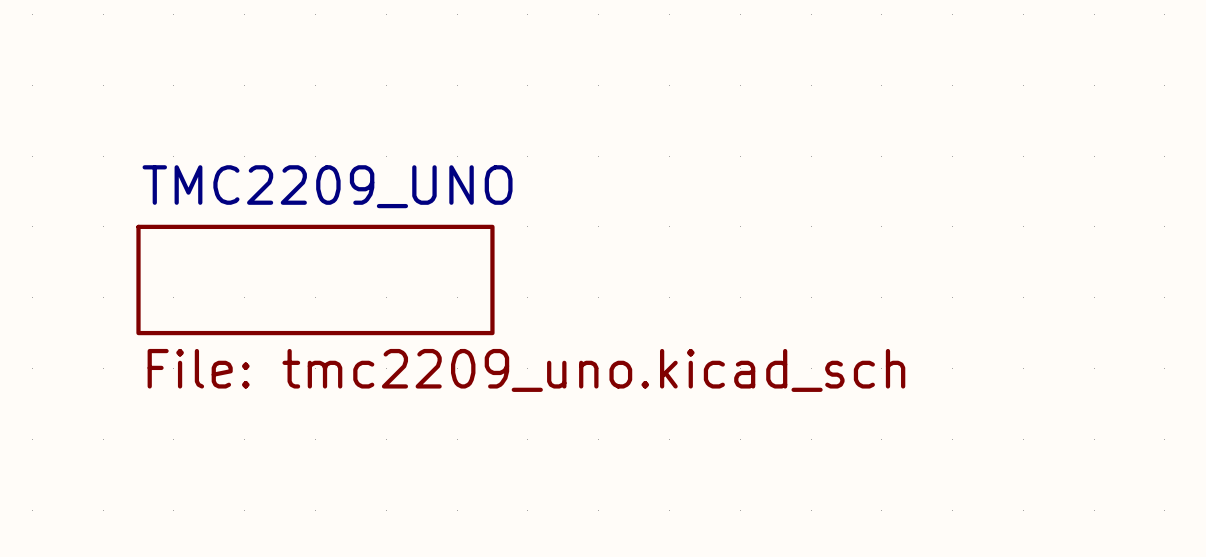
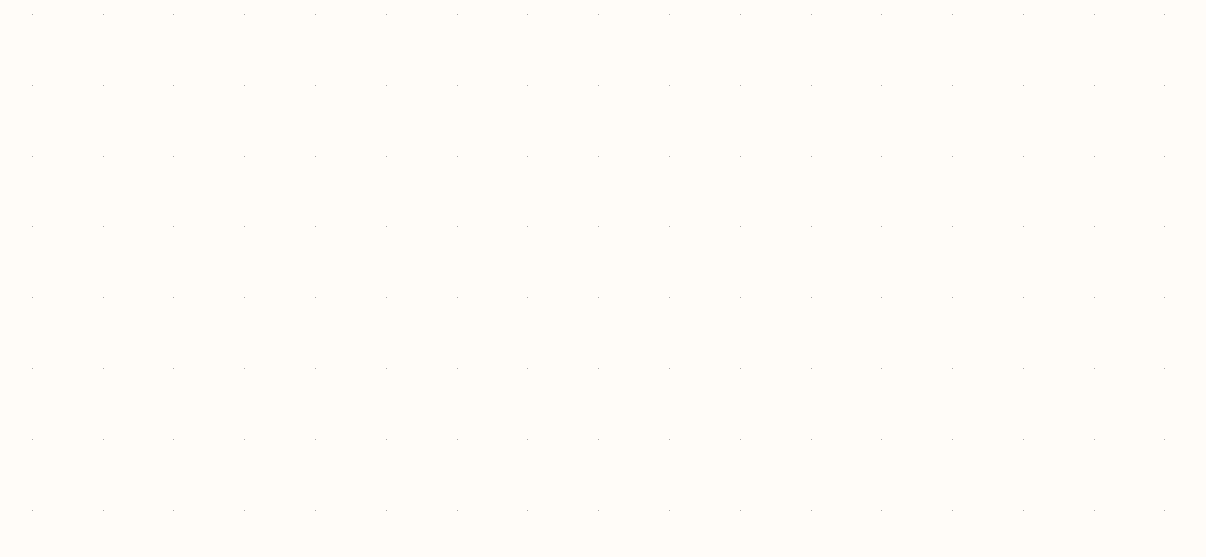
sheet TMC2209_UNO: File: tmc2209_uno.kicad_sch (315, 279) -> none

